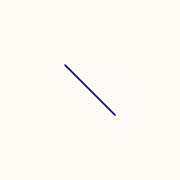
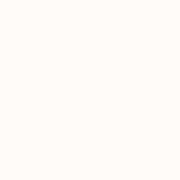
wire: (65, 65) (114, 114) -> none

